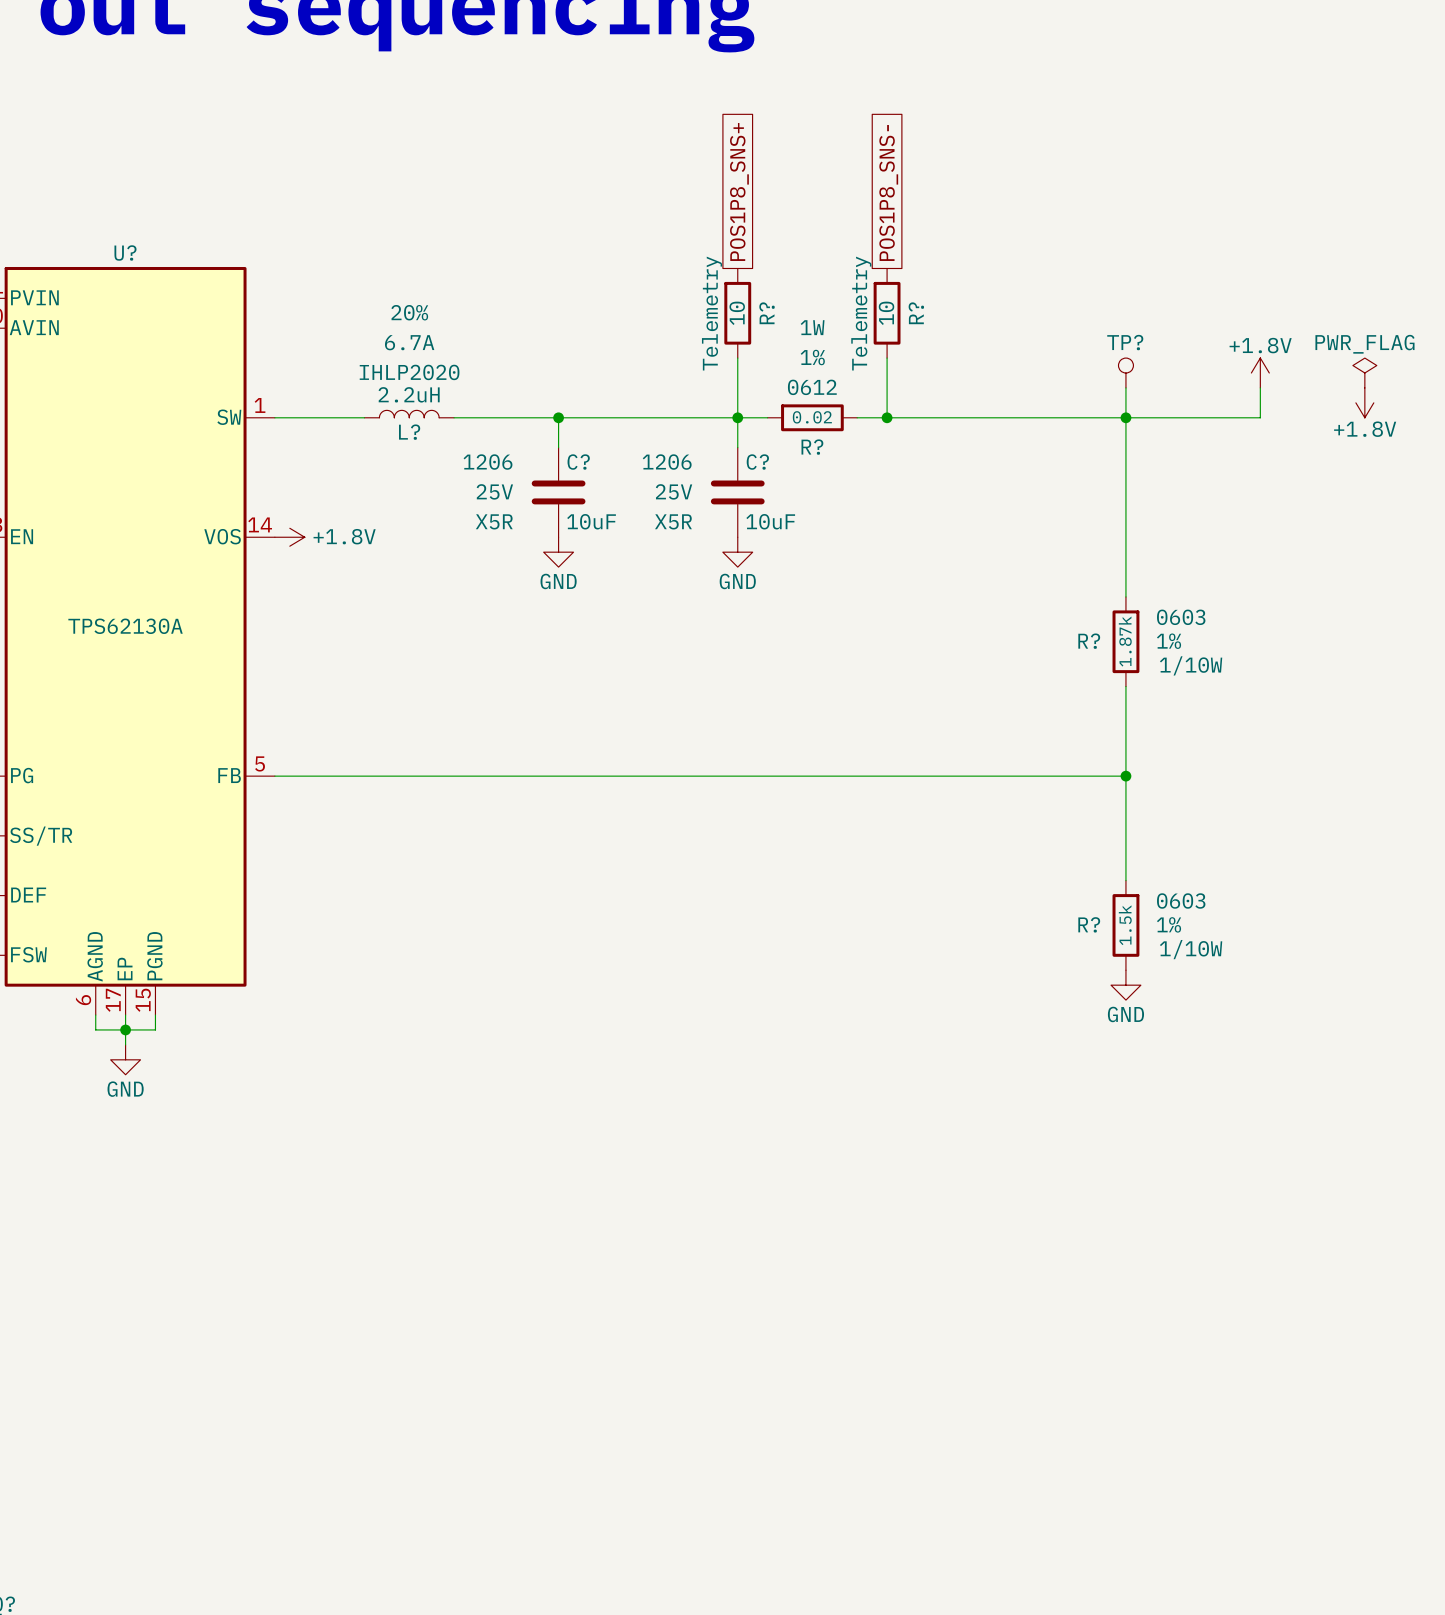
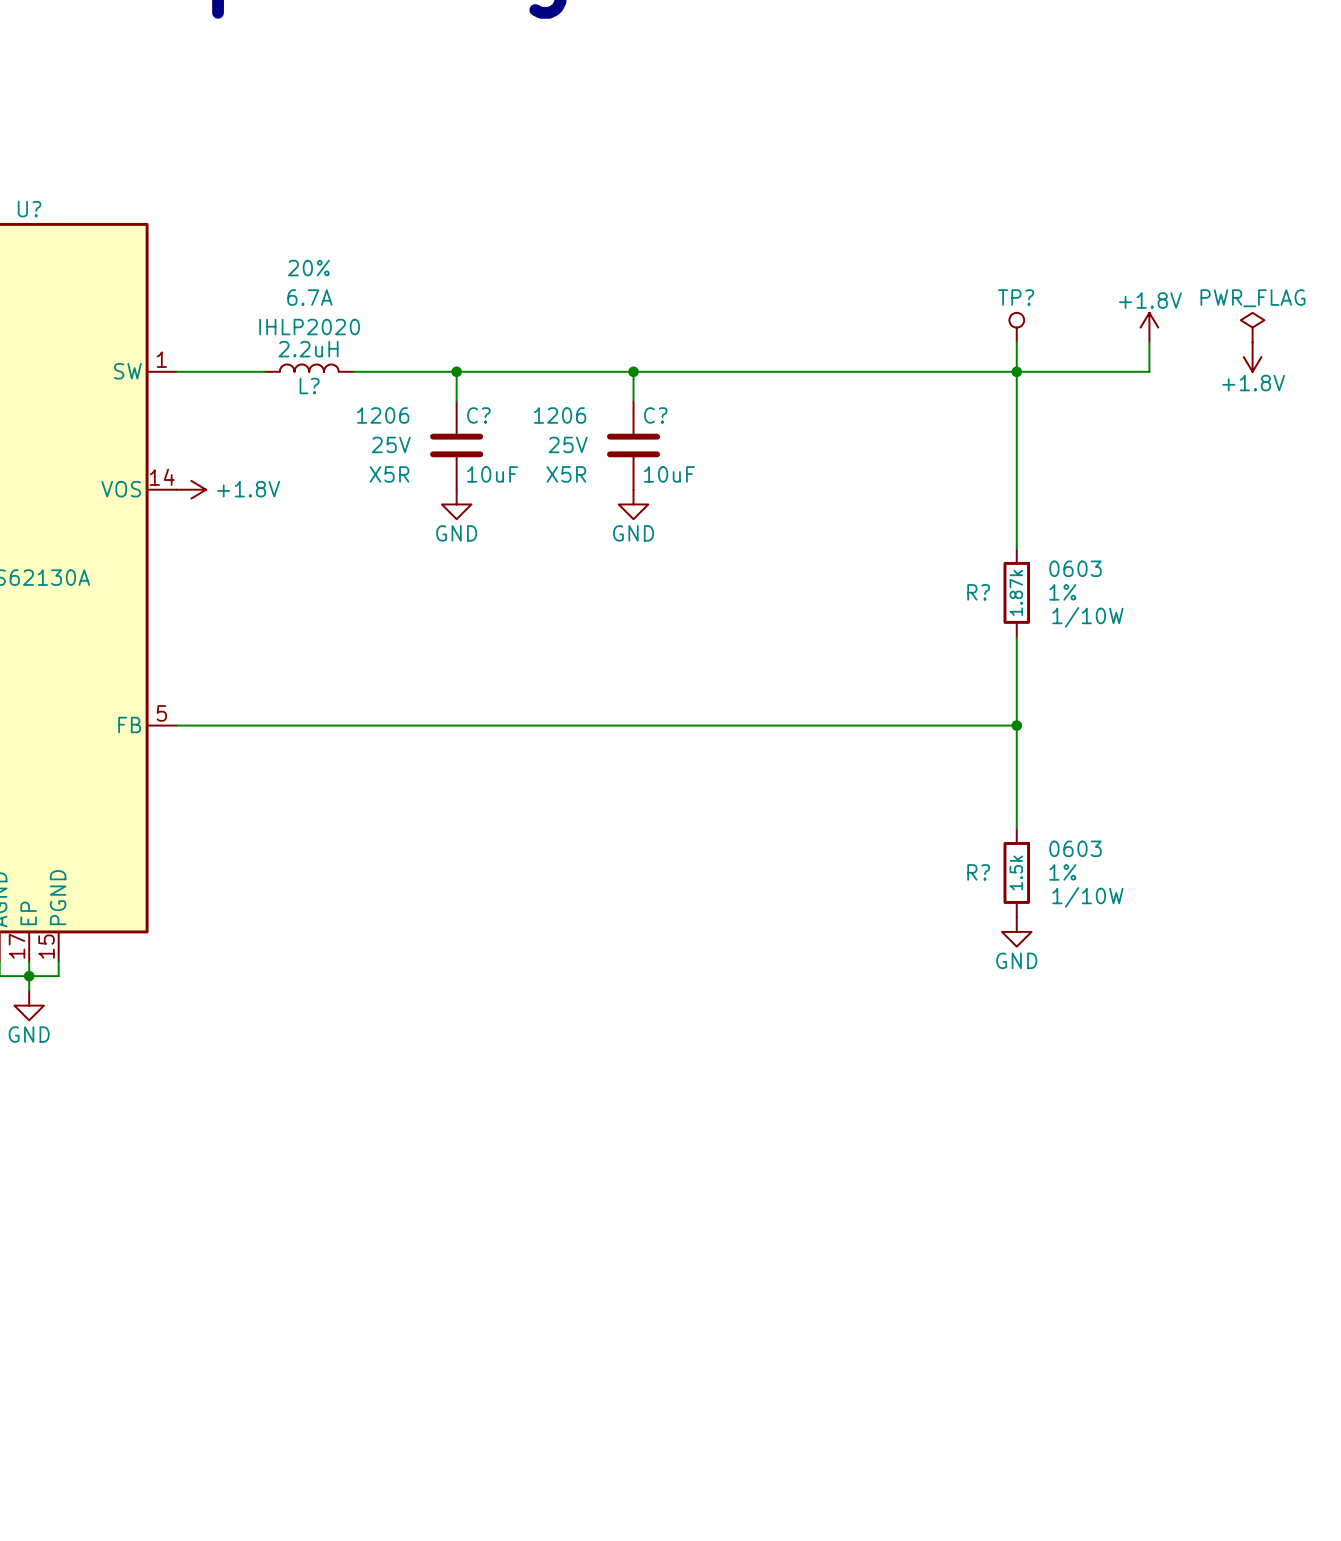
global label: POS1P8_SNS+ (739, 191) -> none
global label: POS1P8_SNS- (888, 192) -> none
R?: 10 (737, 313) -> none
R?: 10 (887, 313) -> none
wire: (737, 358) (737, 417) -> none
wire: (887, 358) (887, 417) -> none
wire: none -> (663, 371) (751, 371)
R?: 0.02 (812, 417) -> none
junction: (887, 417) -> none

